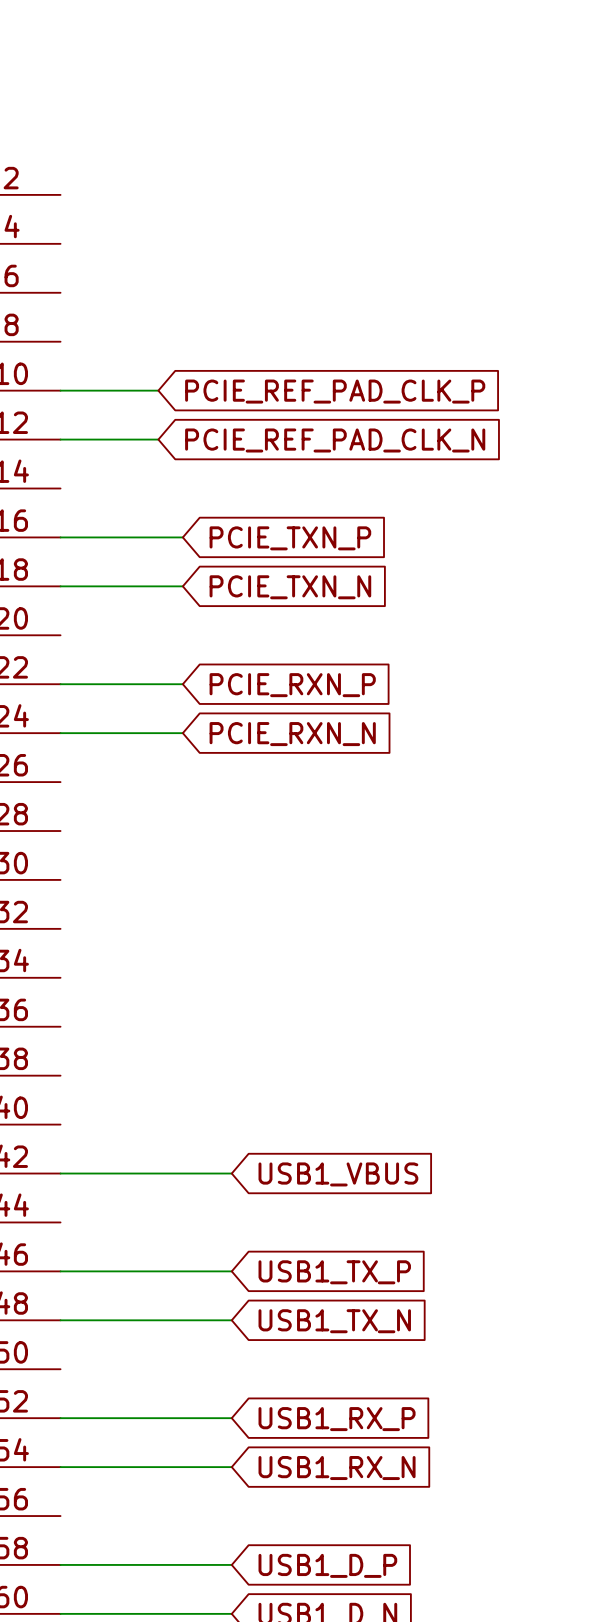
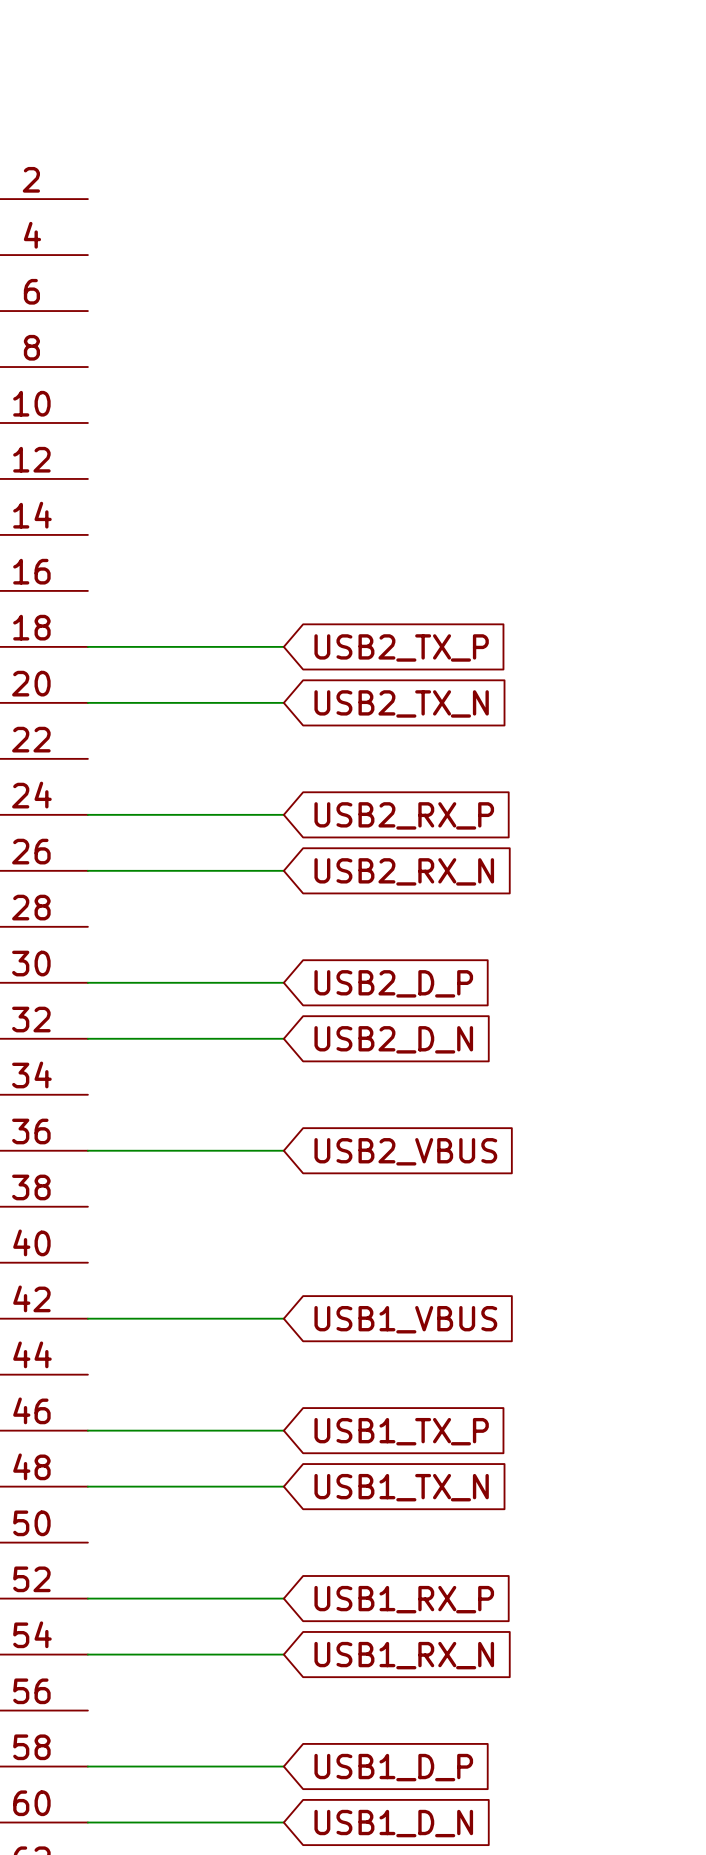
wire: (60, 390) (158, 390) -> none
global label: PCIE_REF_PAD_CLK_P (335, 391) -> none
wire: (60, 439) (158, 439) -> none
global label: PCIE_REF_PAD_CLK_N (335, 440) -> none
wire: (60, 537) (182, 537) -> none
global label: PCIE_TXN_P (290, 538) -> none
wire: none -> (227, 646) (283, 646)
global label: PCIE_TXN_N (290, 587) -> none
global label: none -> USB2_TX_P (401, 647)
wire: none -> (87, 702) (283, 702)
global label: none -> USB2_TX_N (401, 703)
wire: (60, 684) (182, 684) -> none
global label: PCIE_RXN_P (292, 685) -> none
wire: none -> (227, 814) (283, 814)
global label: PCIE_RXN_N (292, 734) -> none
global label: none -> USB2_RX_P (404, 815)
wire: none -> (87, 870) (283, 870)
global label: none -> USB2_RX_N (404, 871)
wire: none -> (87, 982) (283, 982)
global label: none -> USB2_D_P (393, 983)
wire: none -> (87, 1038) (283, 1038)
global label: none -> USB2_D_N (393, 1039)
wire: none -> (87, 1150) (283, 1150)
global label: none -> USB2_VBUS (405, 1151)

